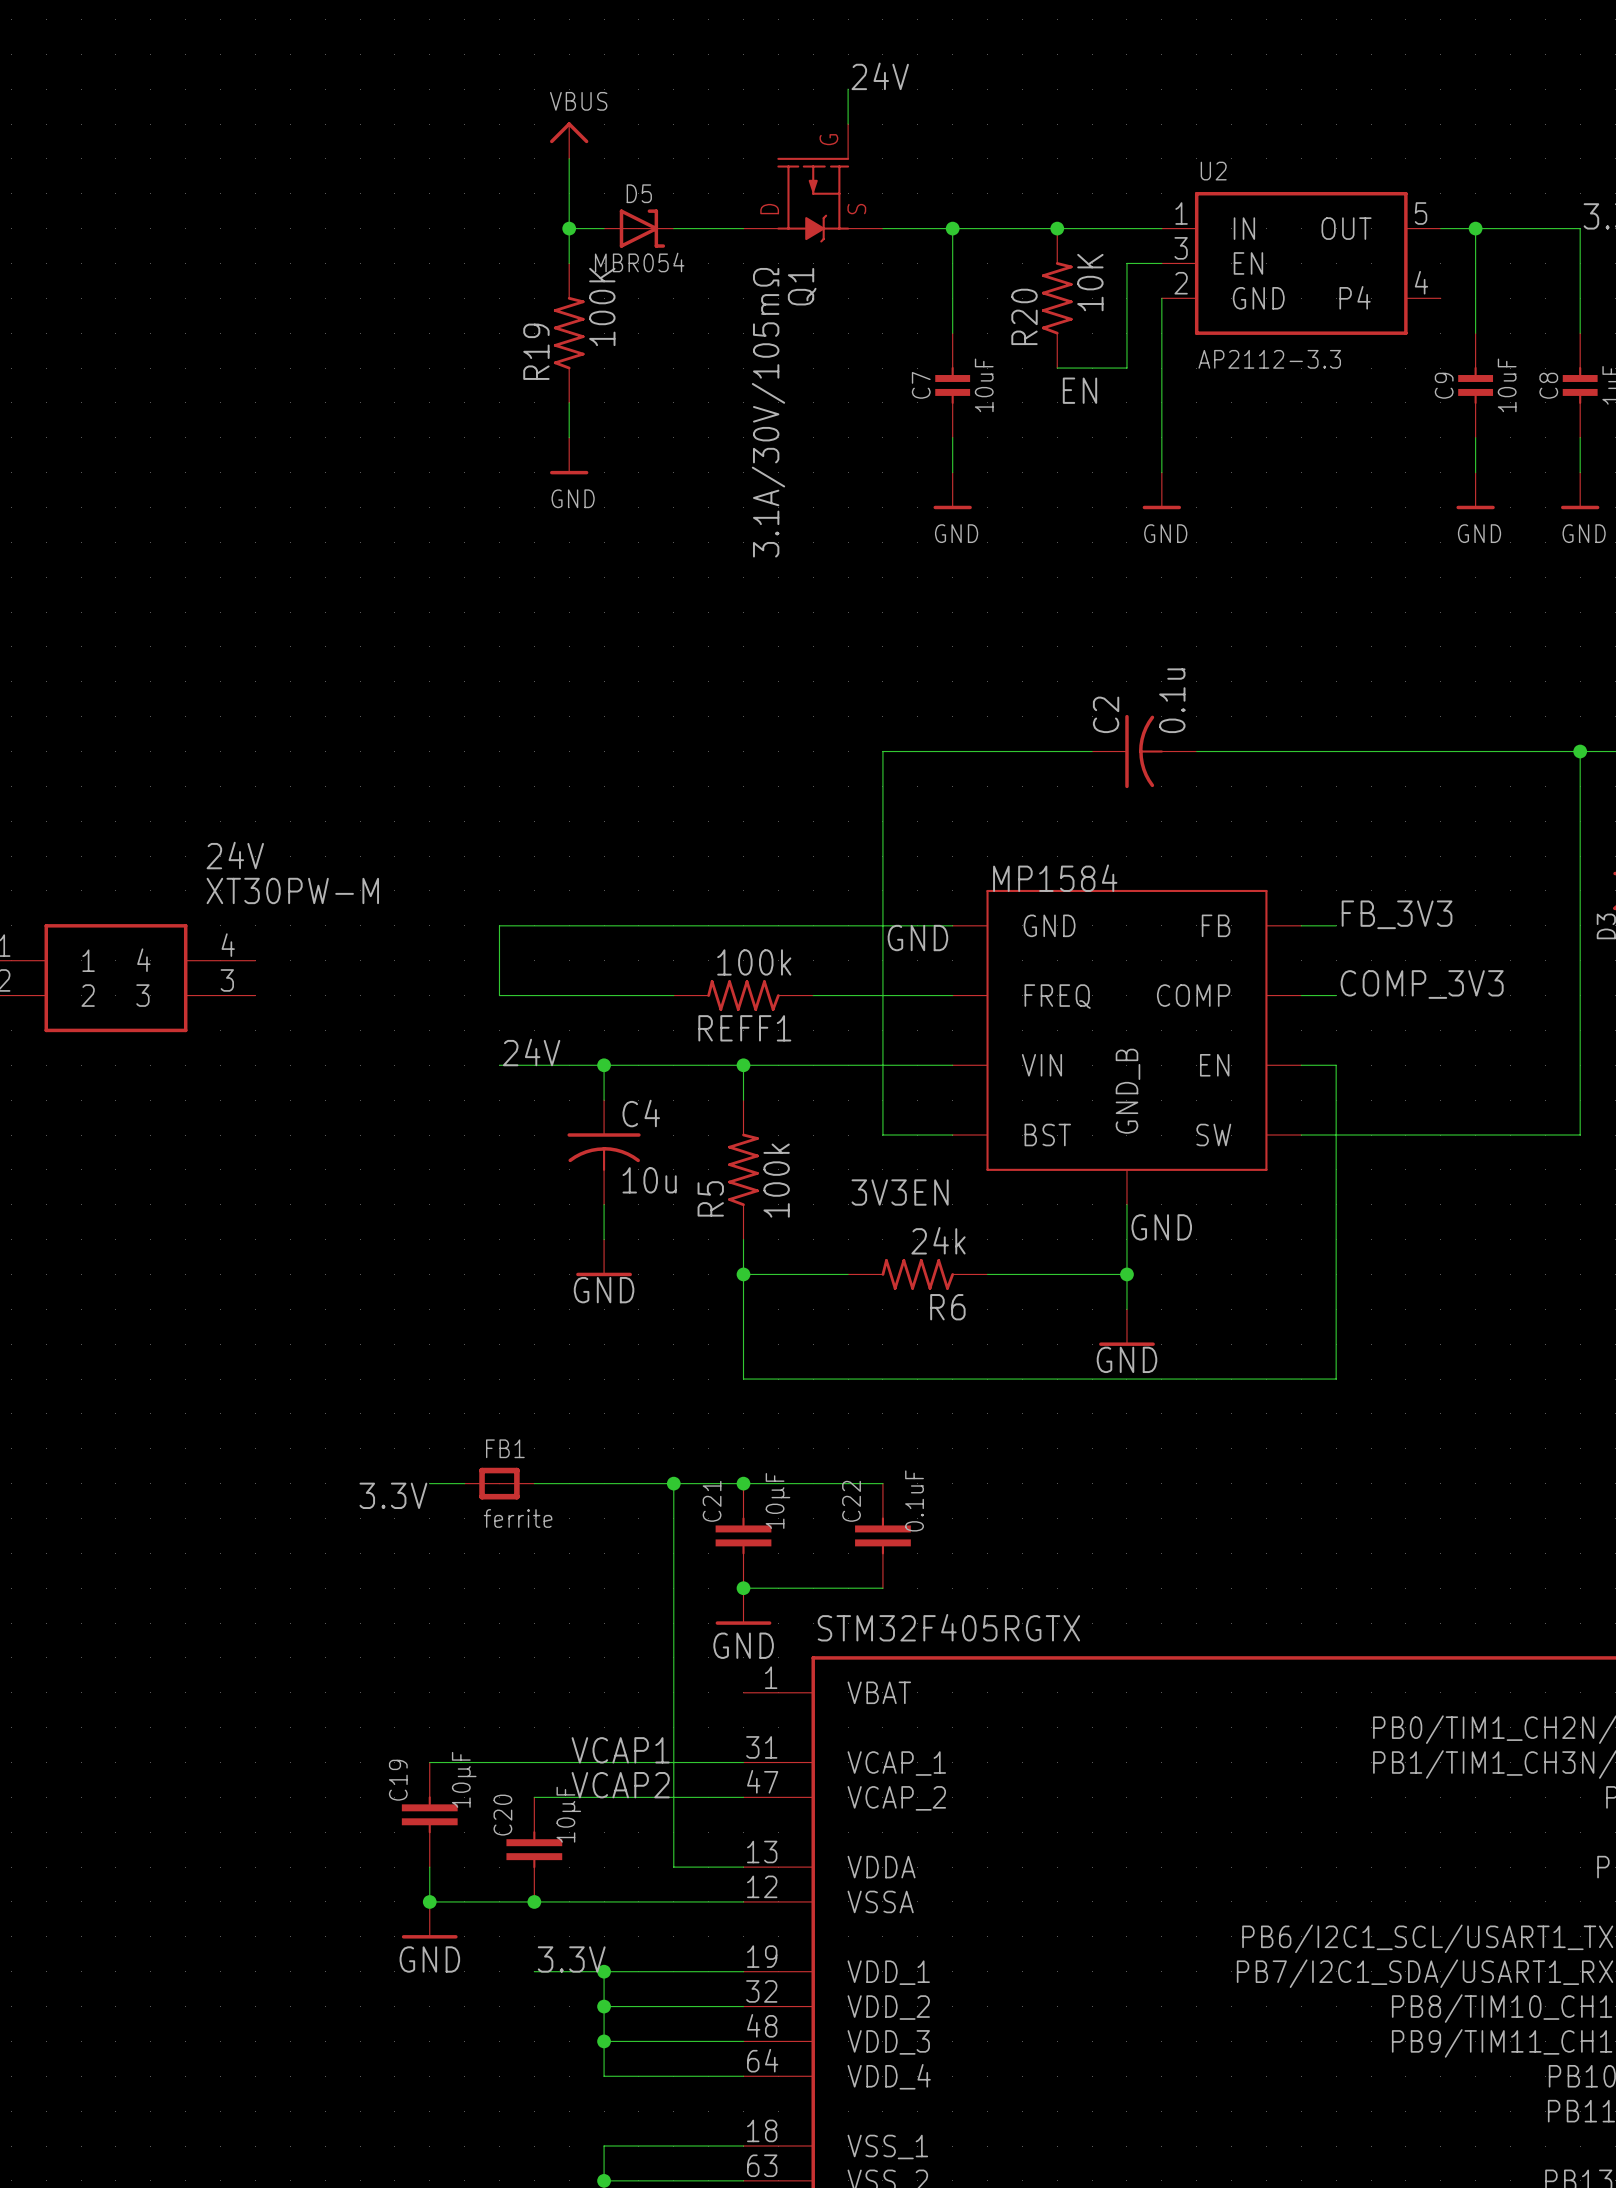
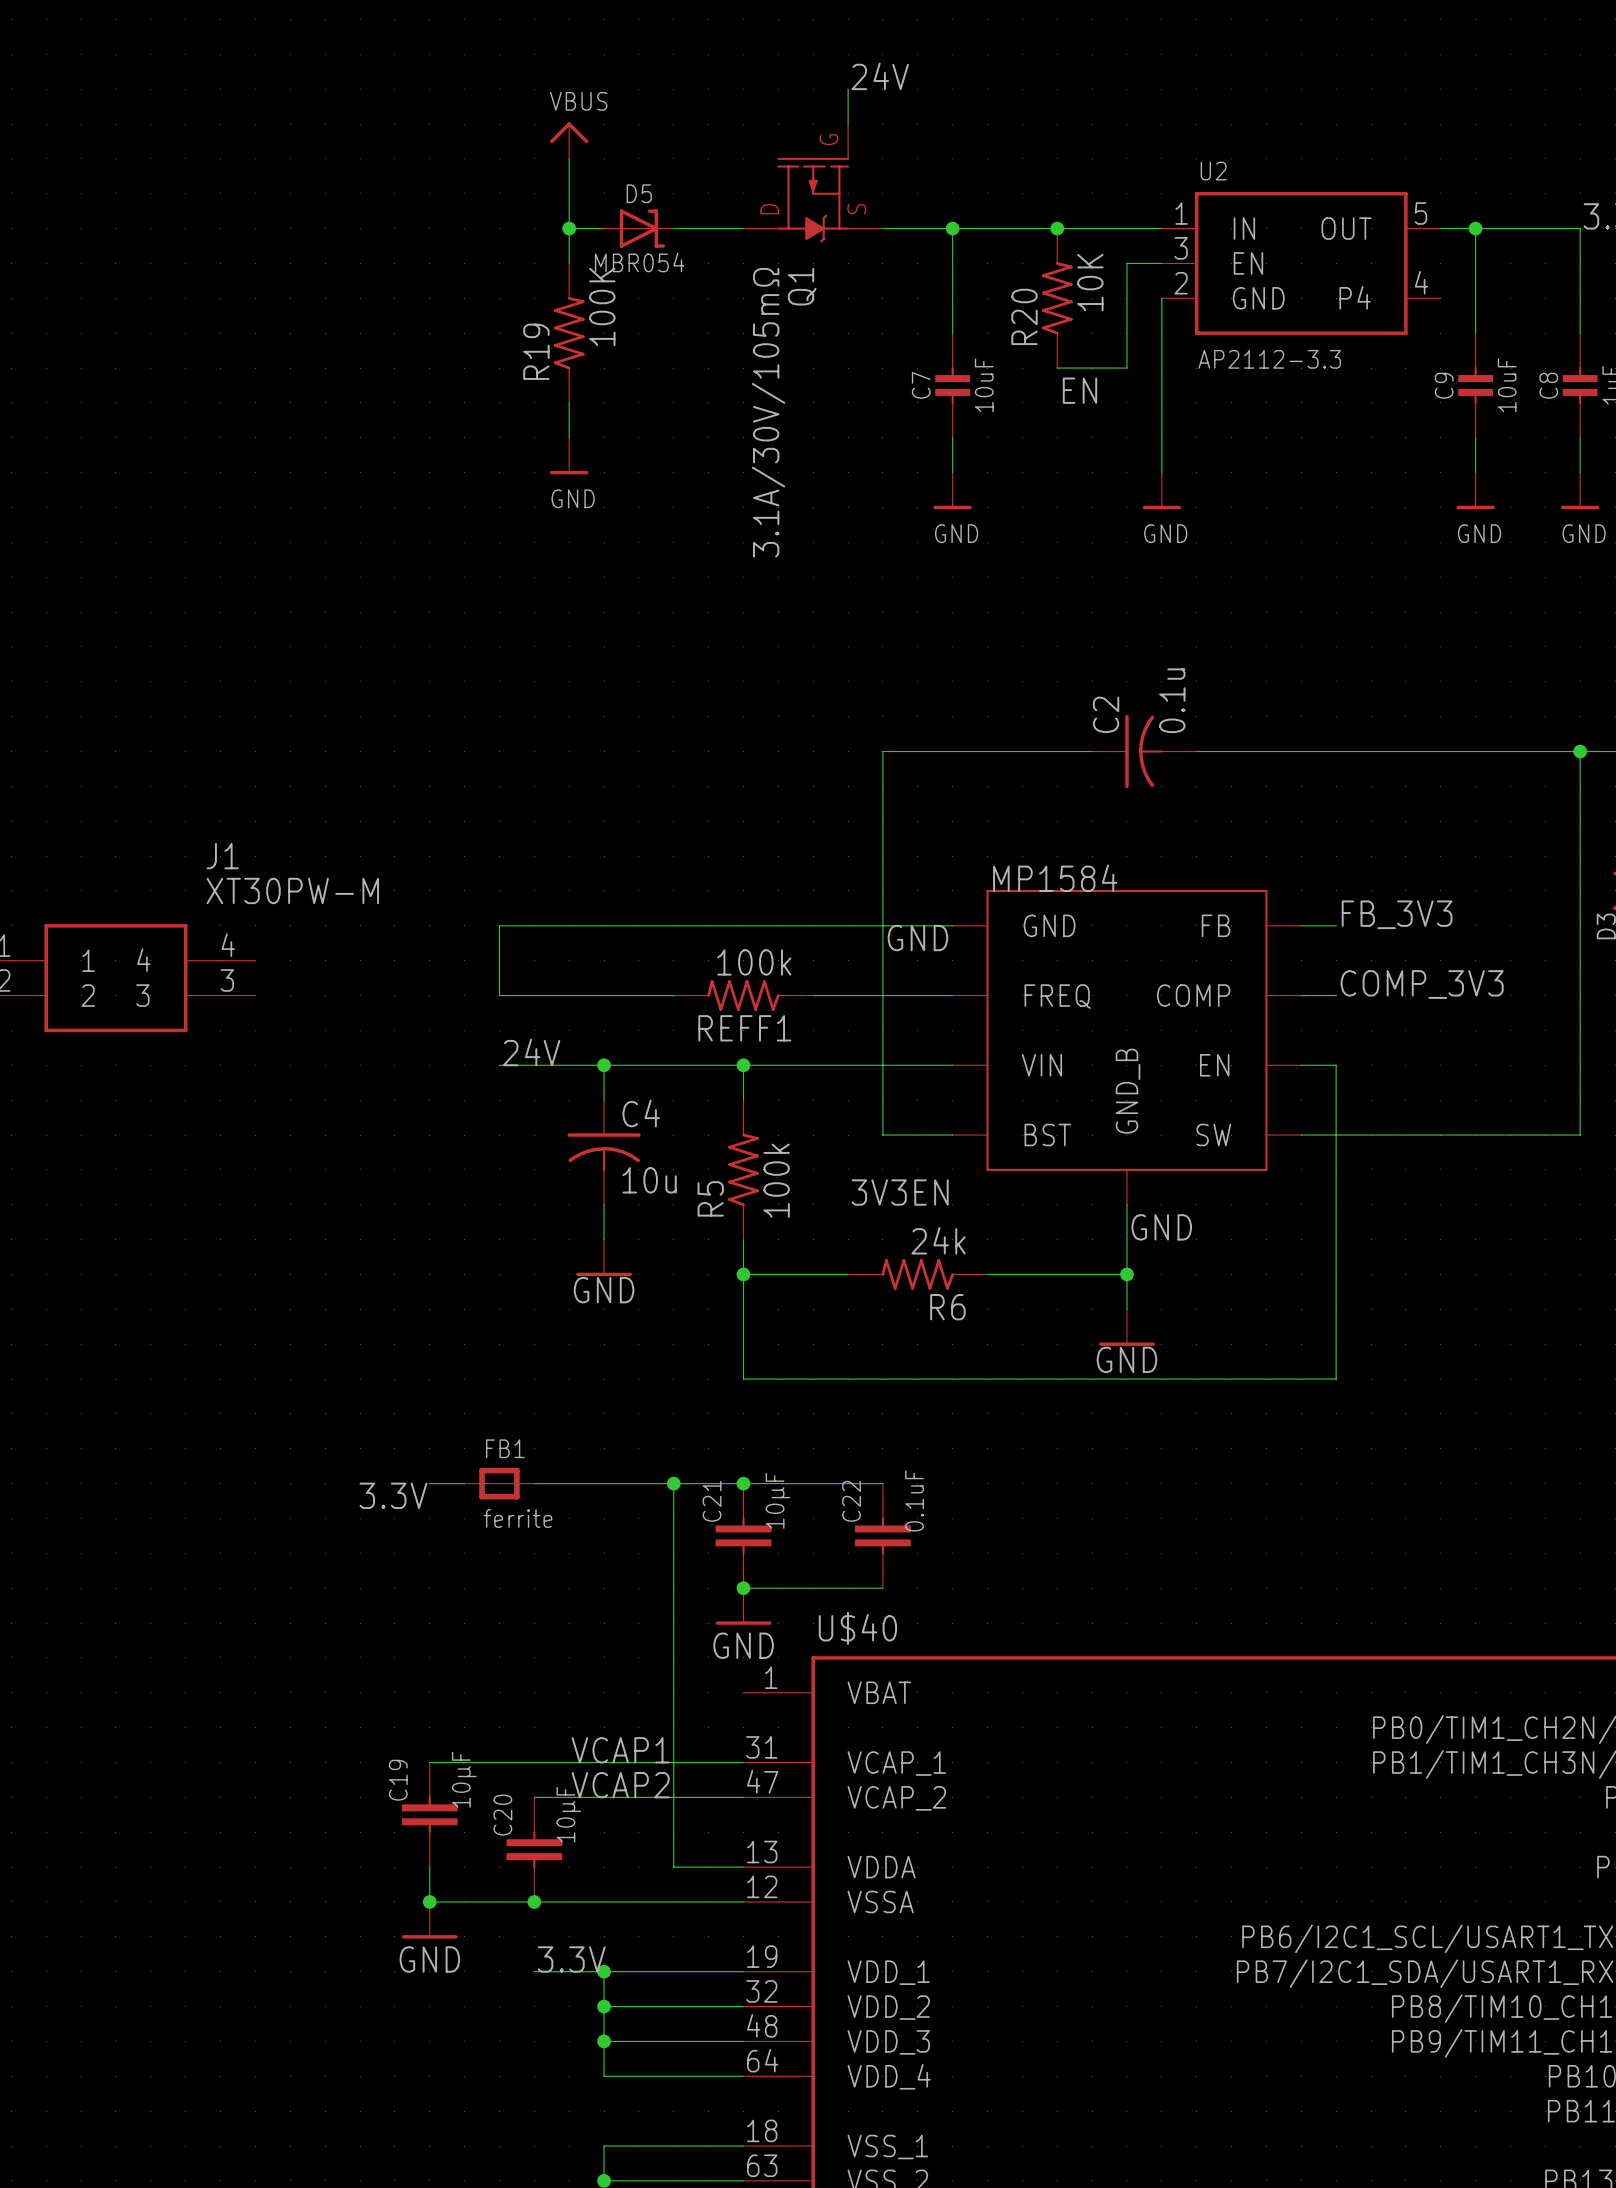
24V name: 24V (235, 855) -> J1 (222, 856)
STM32F405RGTX name: STM32F405RGTX (948, 1627) -> U$40 (857, 1628)

